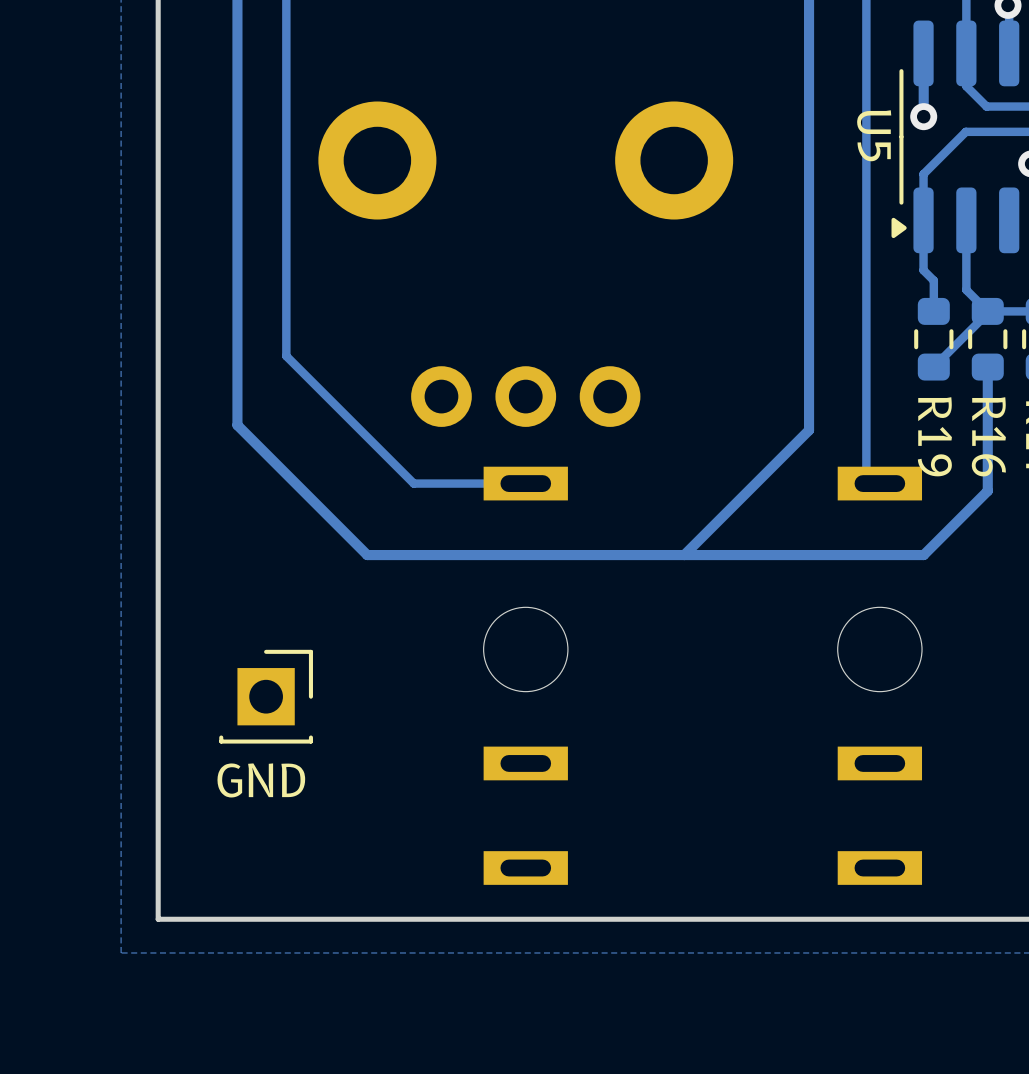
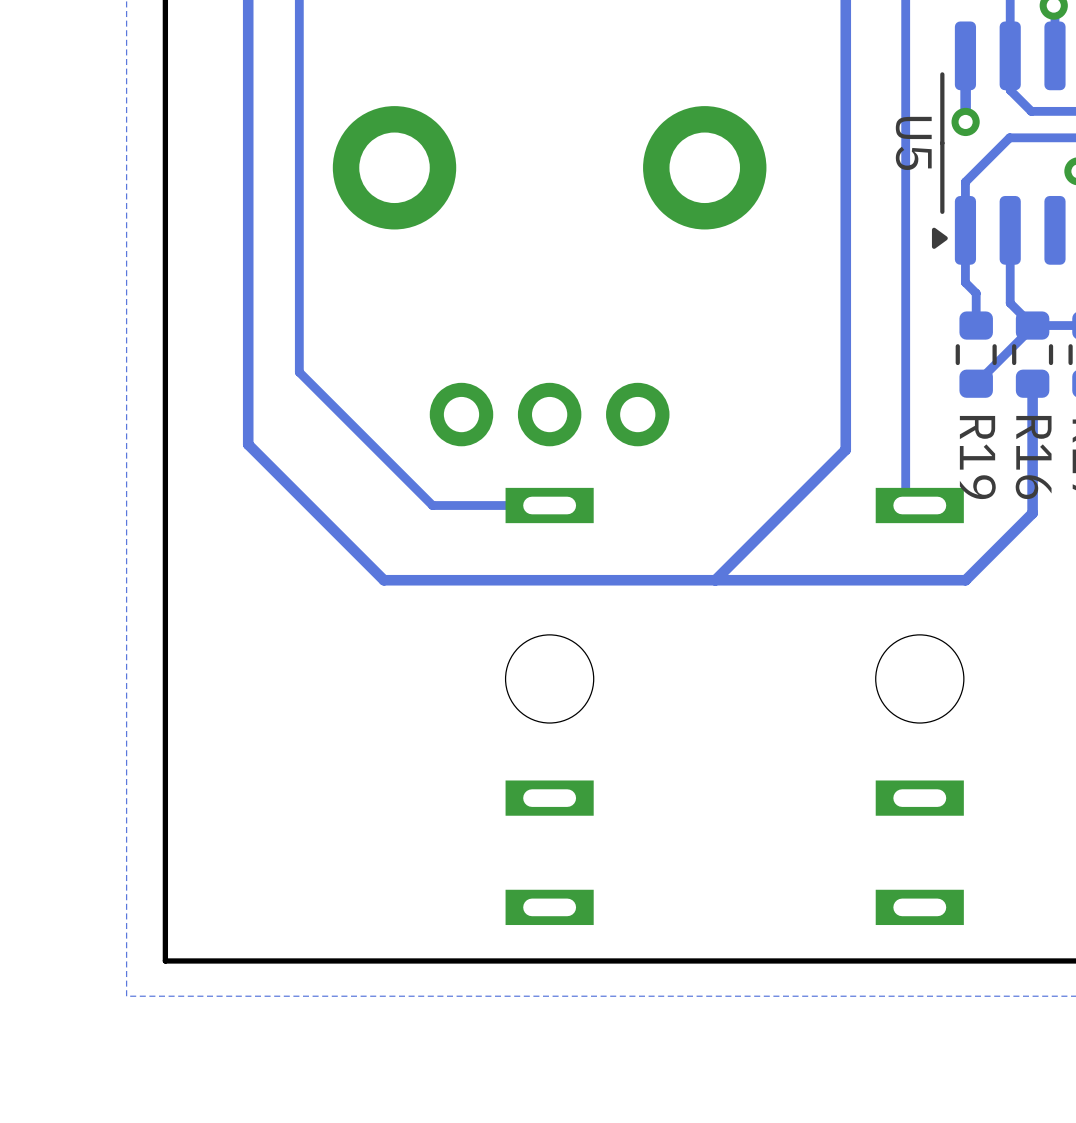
part: (266, 696) -> none
text: GND (261, 780) -> none

